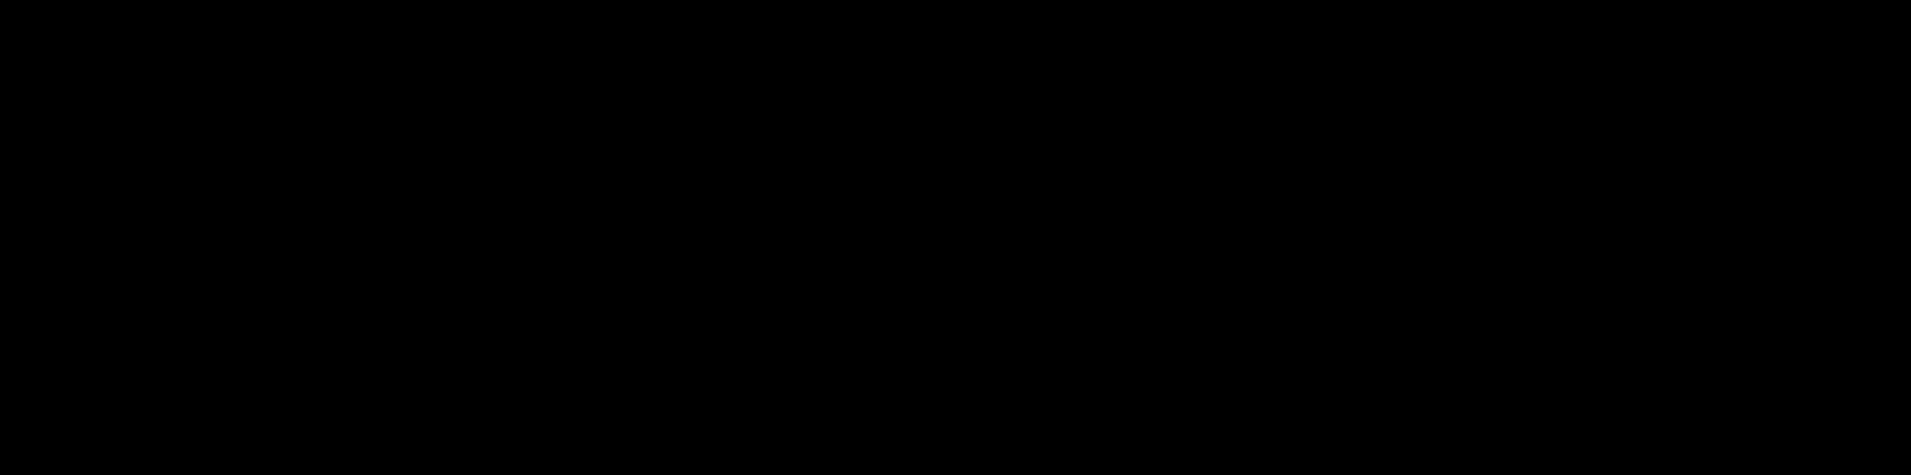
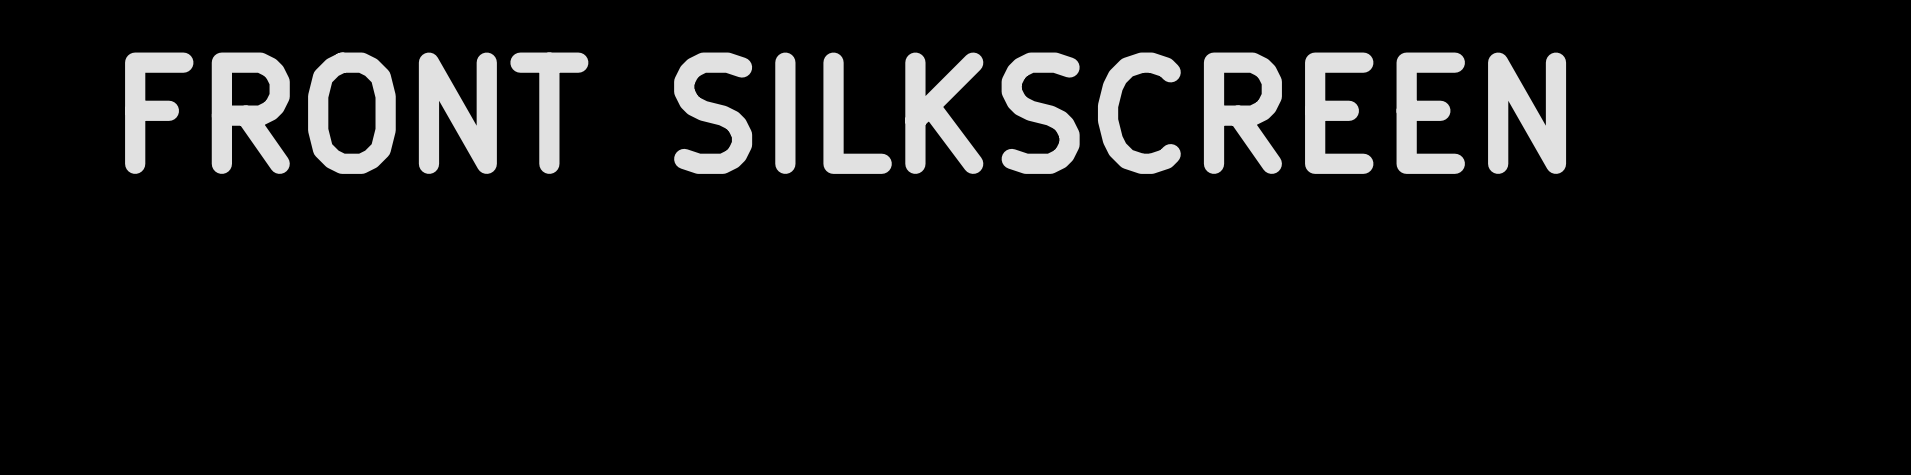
text: none -> FRONT SILKSCREEN (845, 113)

